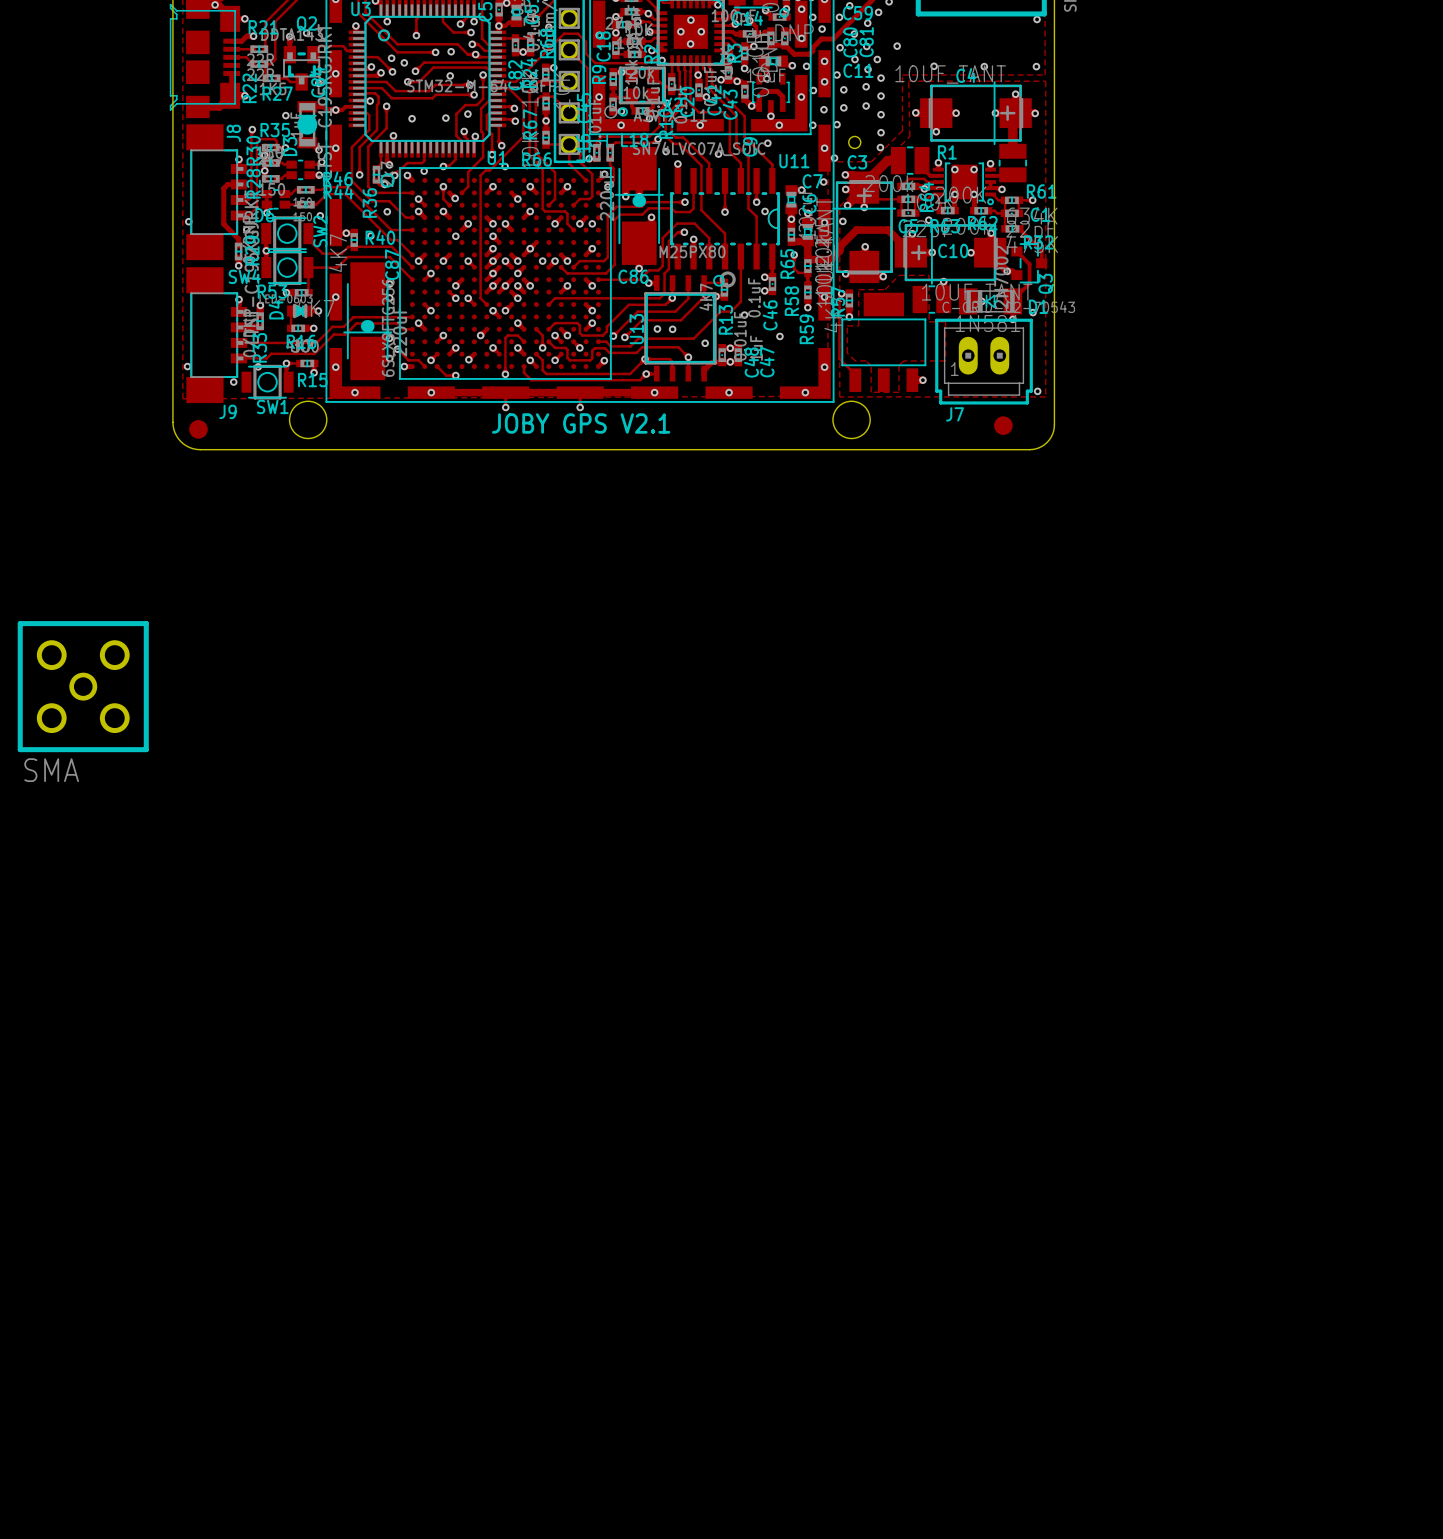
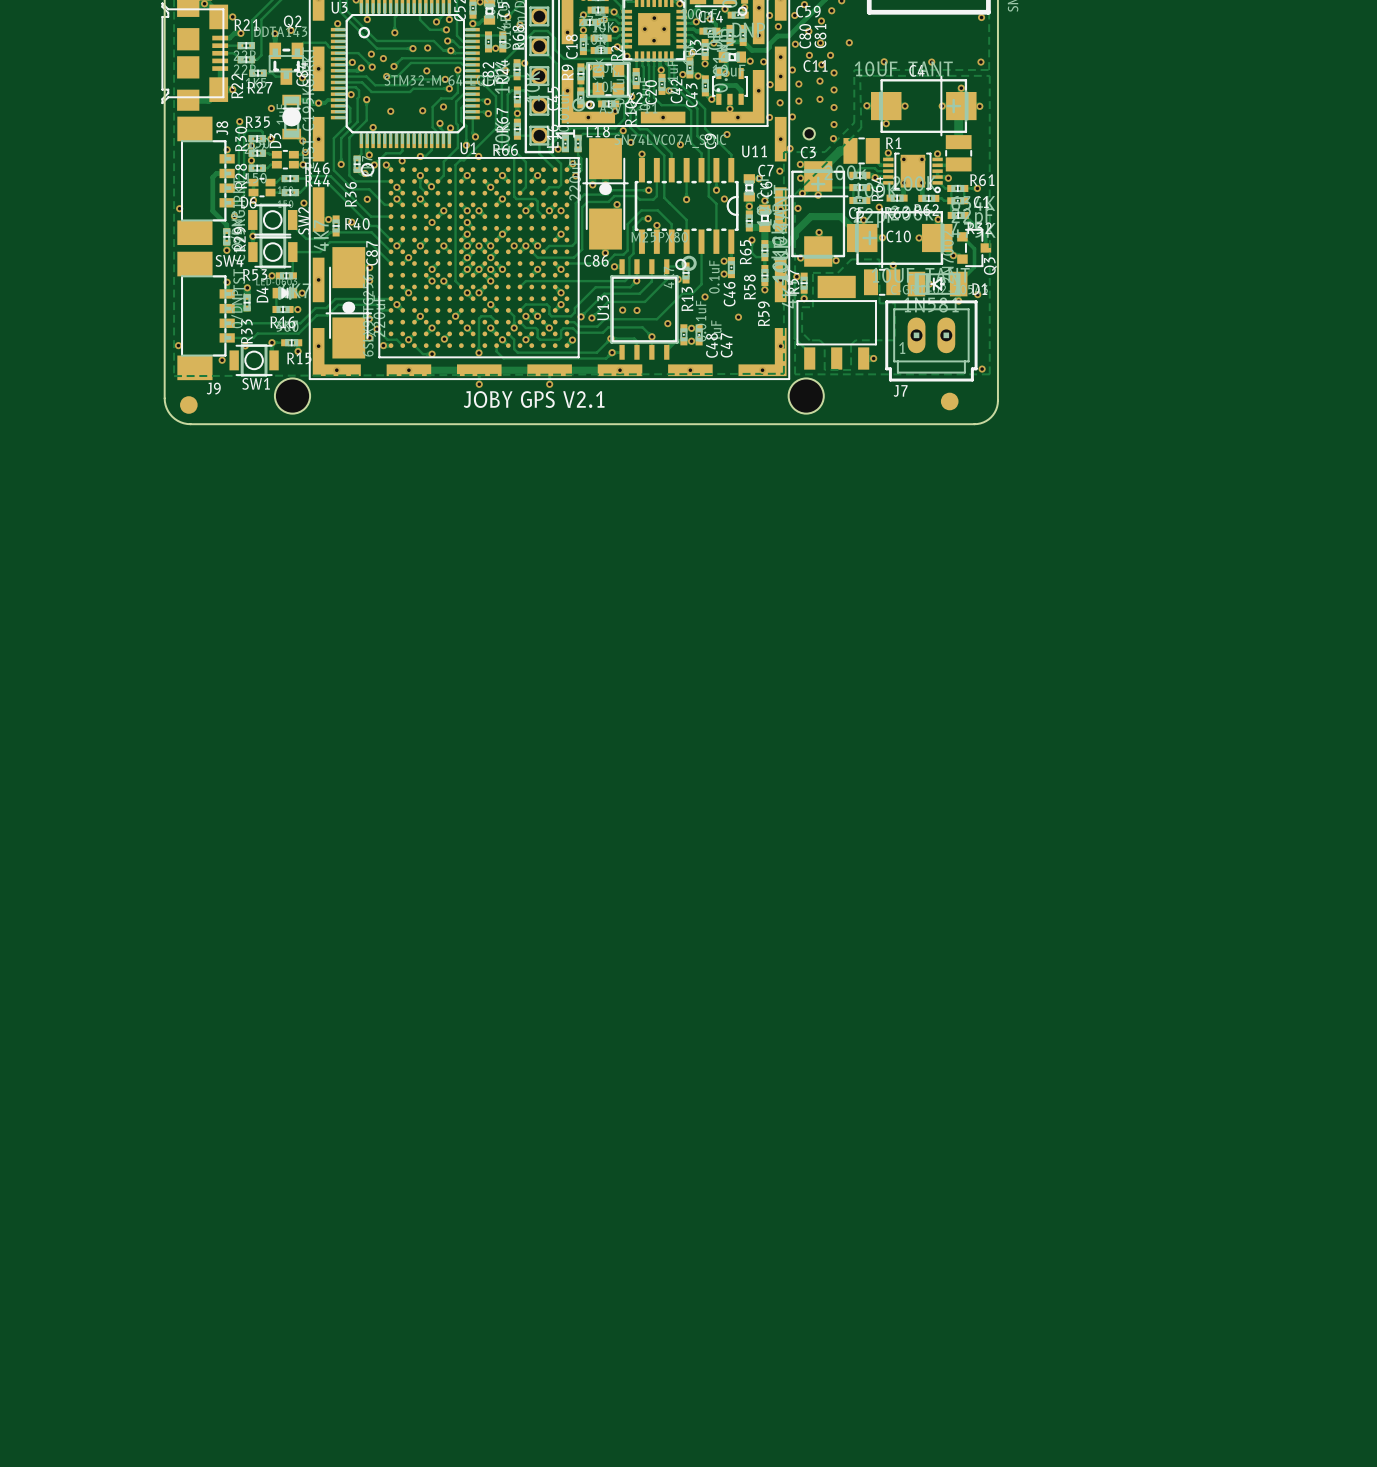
part: SMA (83, 686) -> none

